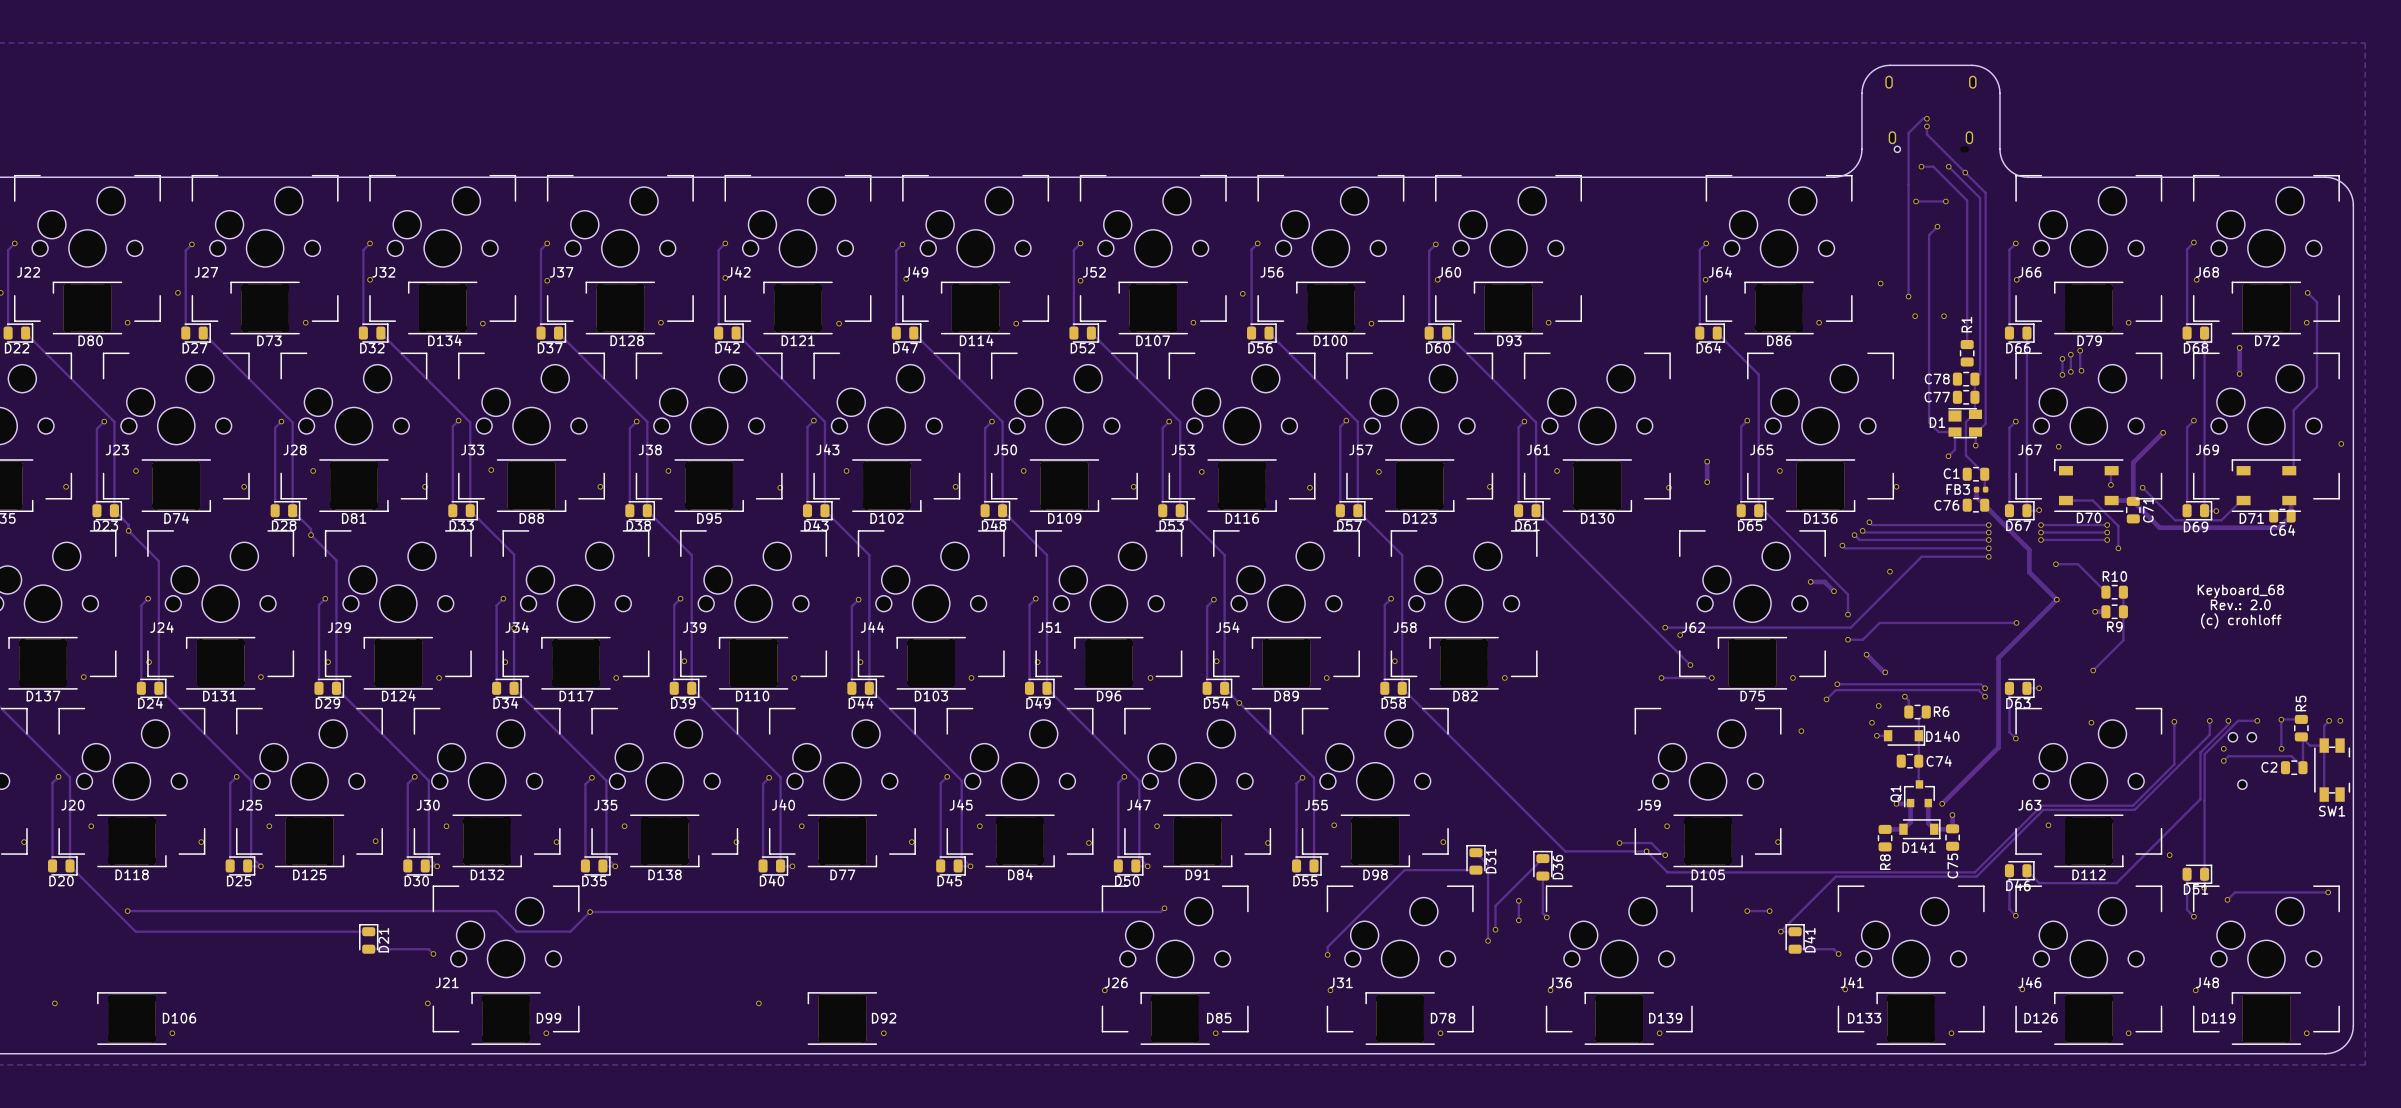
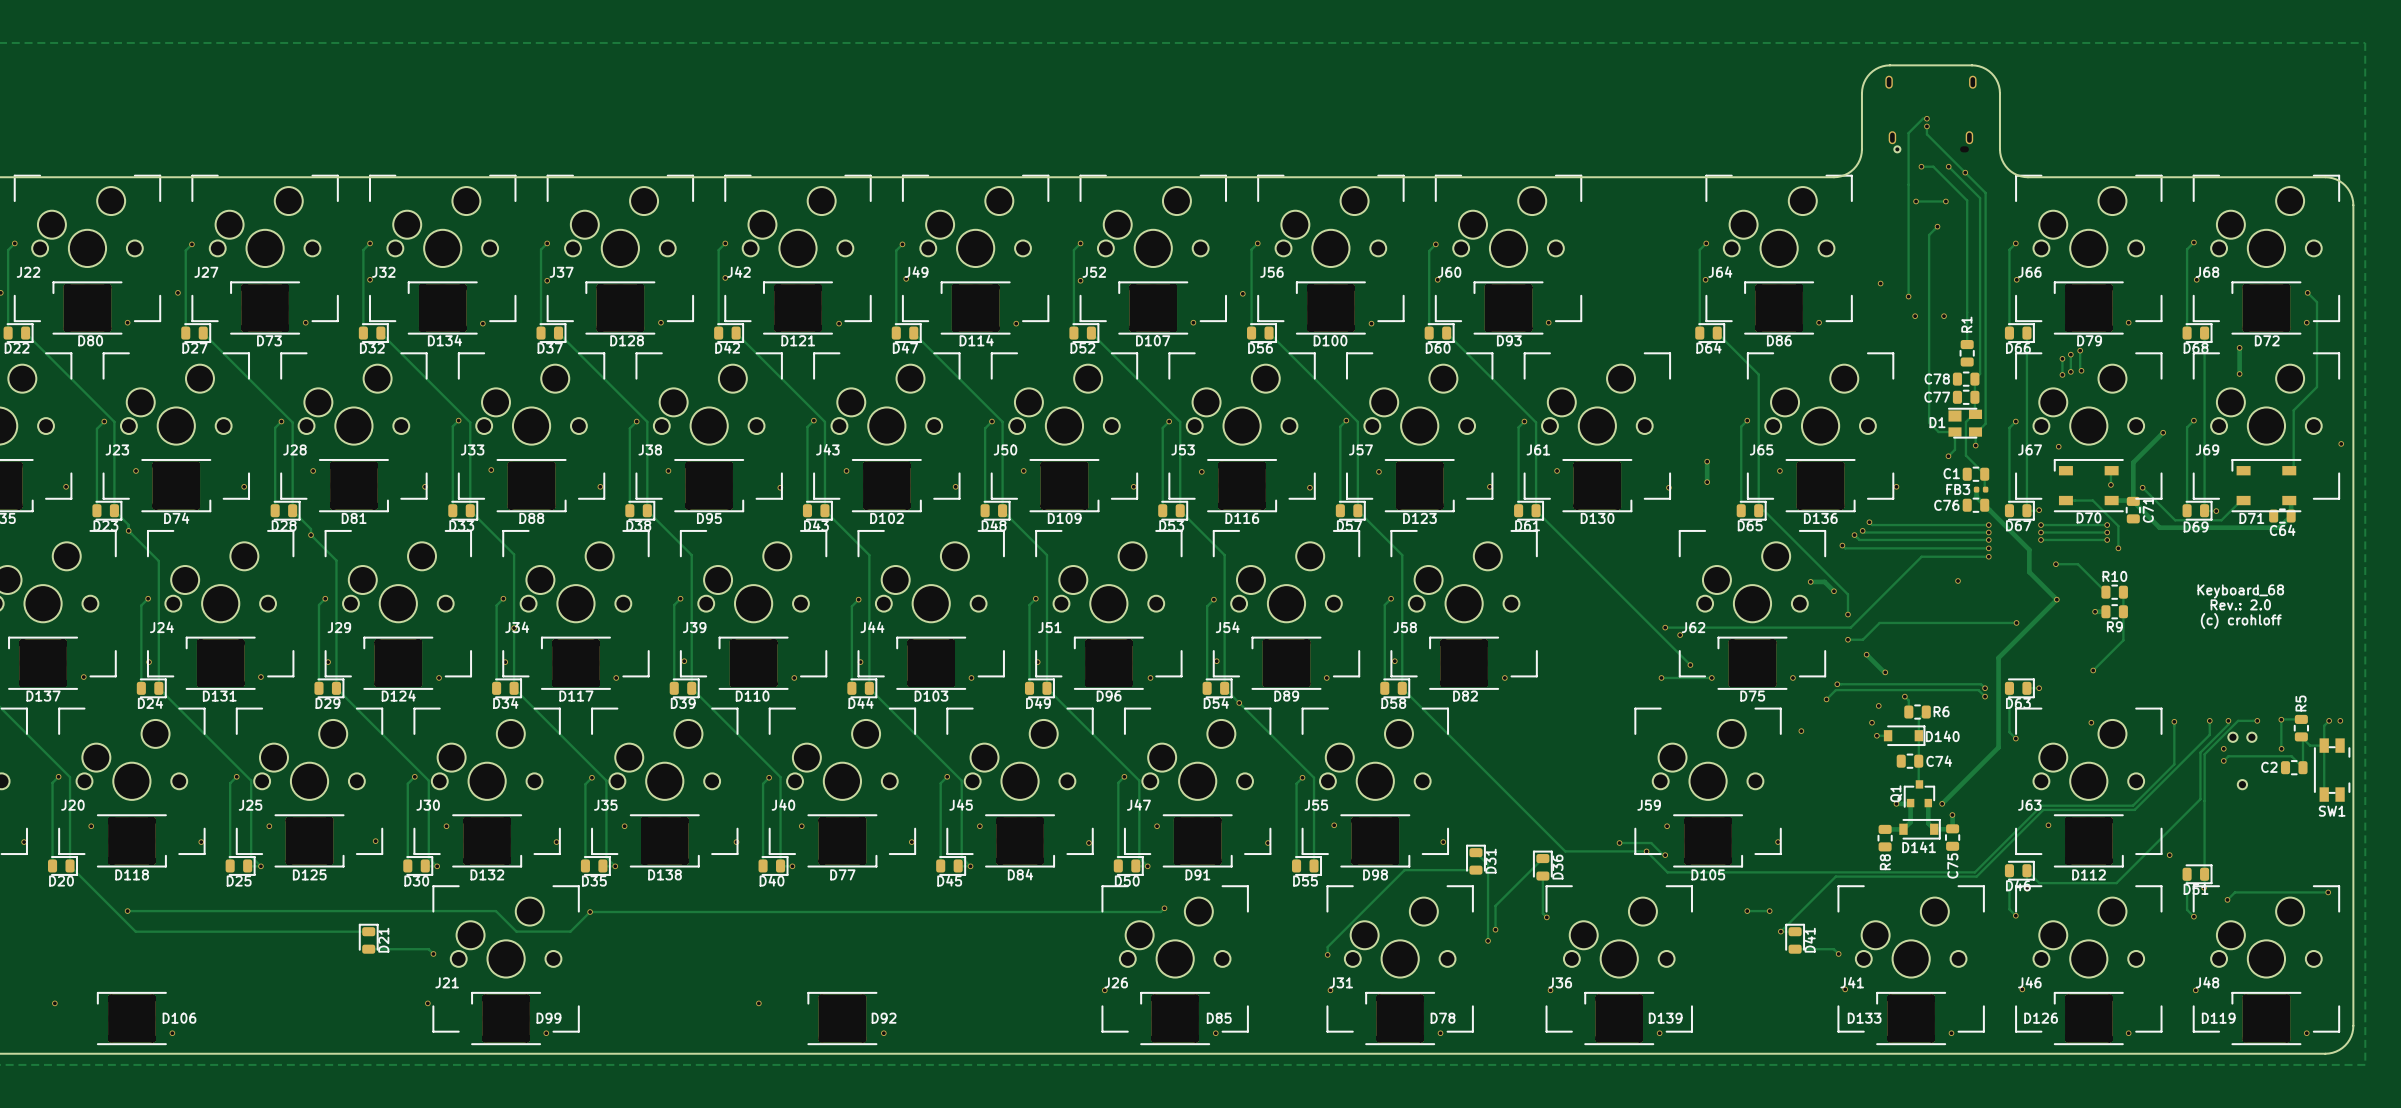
via: (1889, 571) -> none
via: none -> (1958, 580)
track: (1518, 900) (1518, 920) -> none
via: (1518, 900) -> none
via: (1518, 920) -> none

